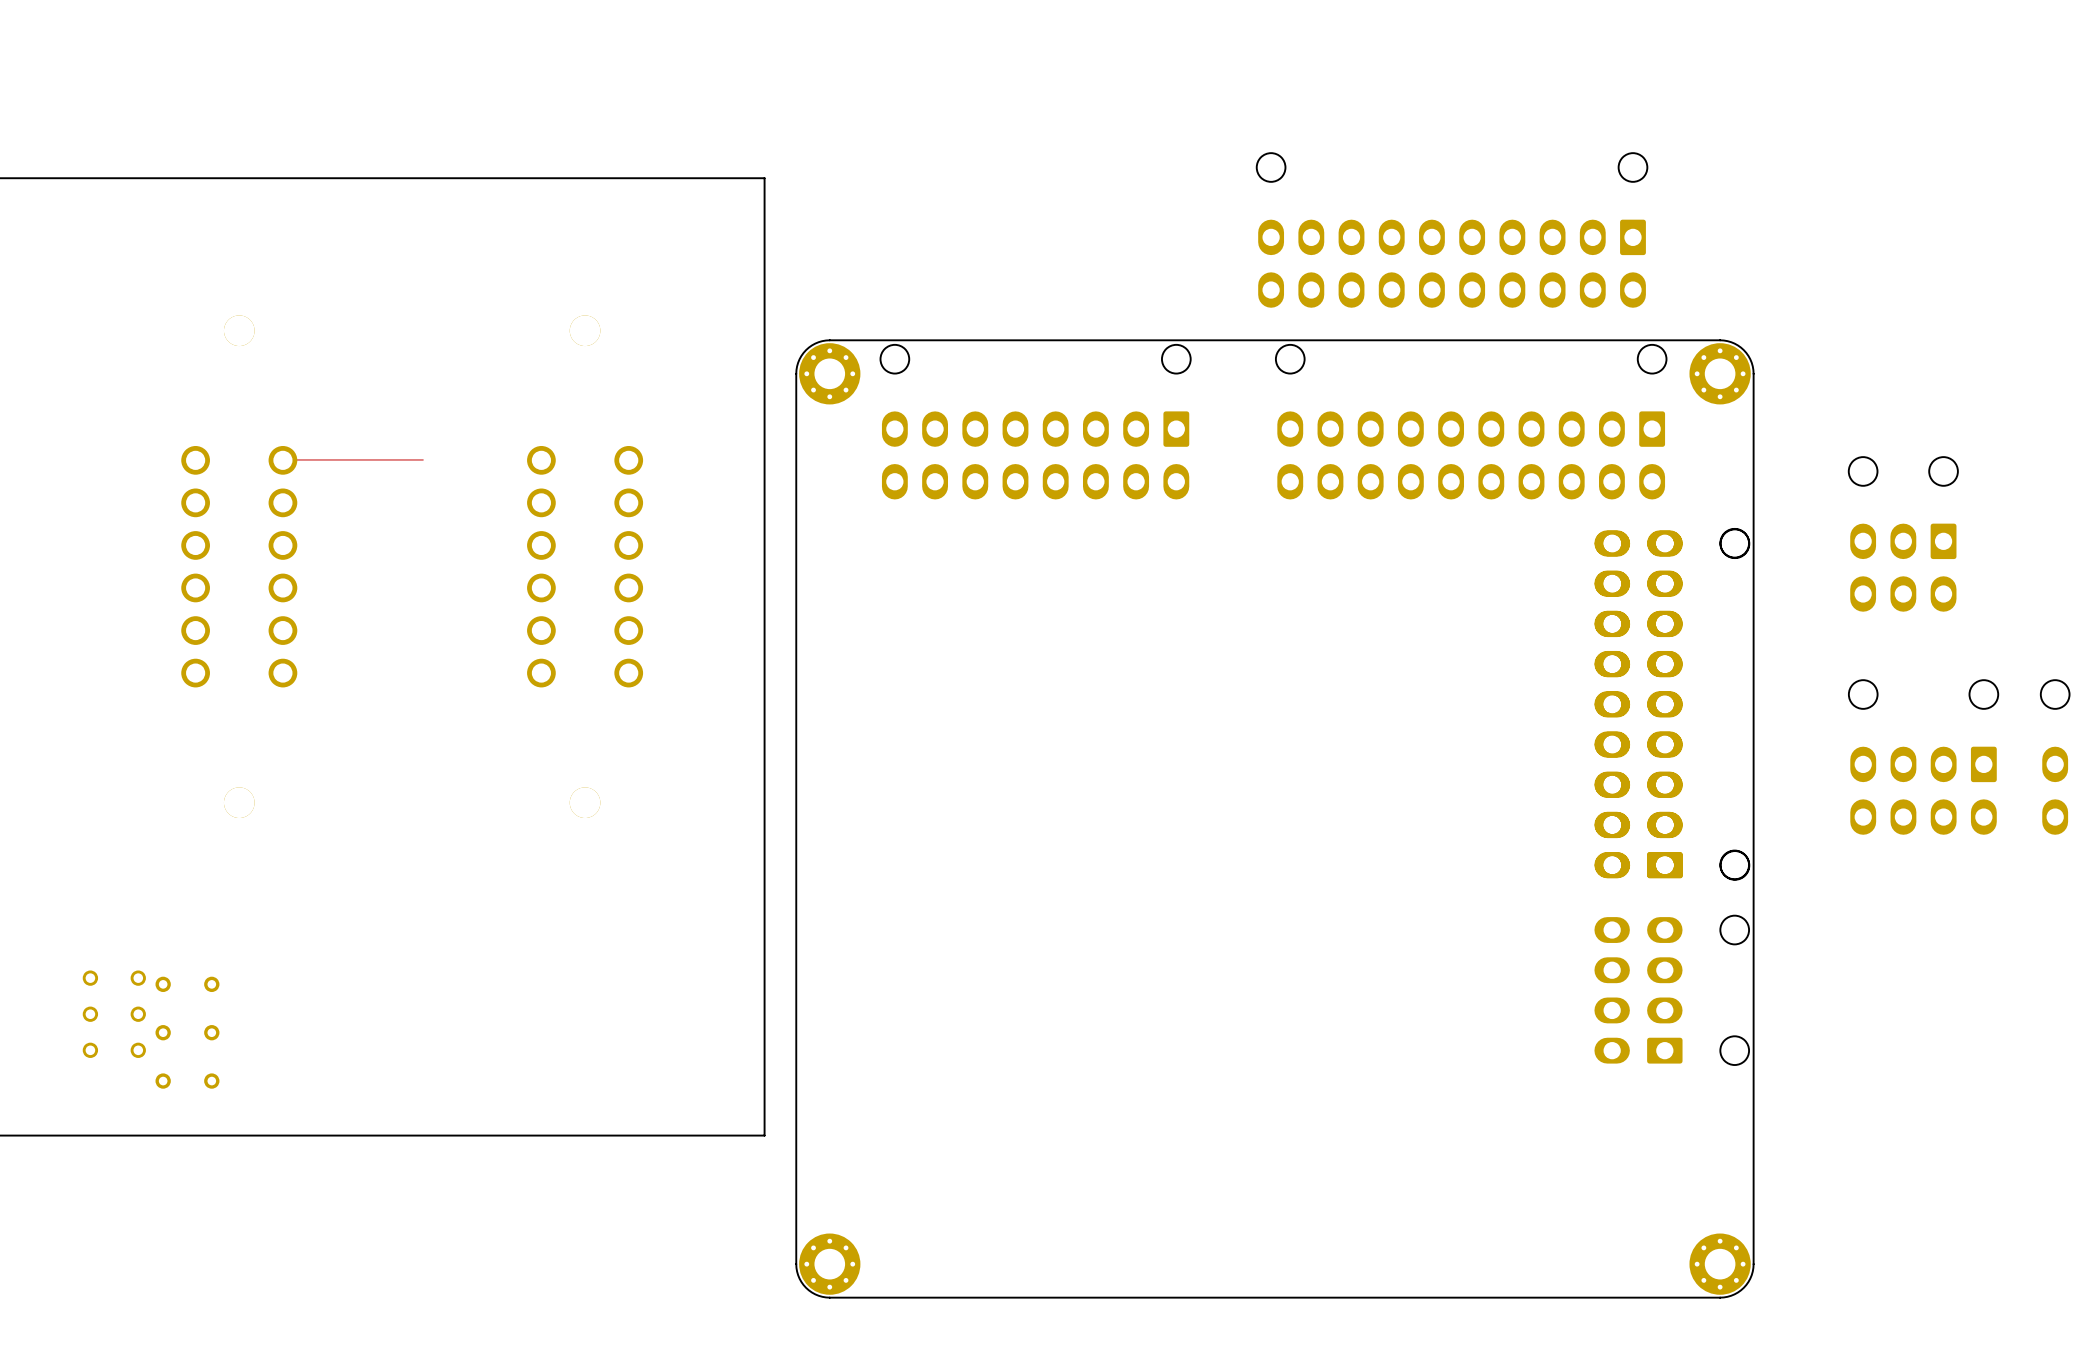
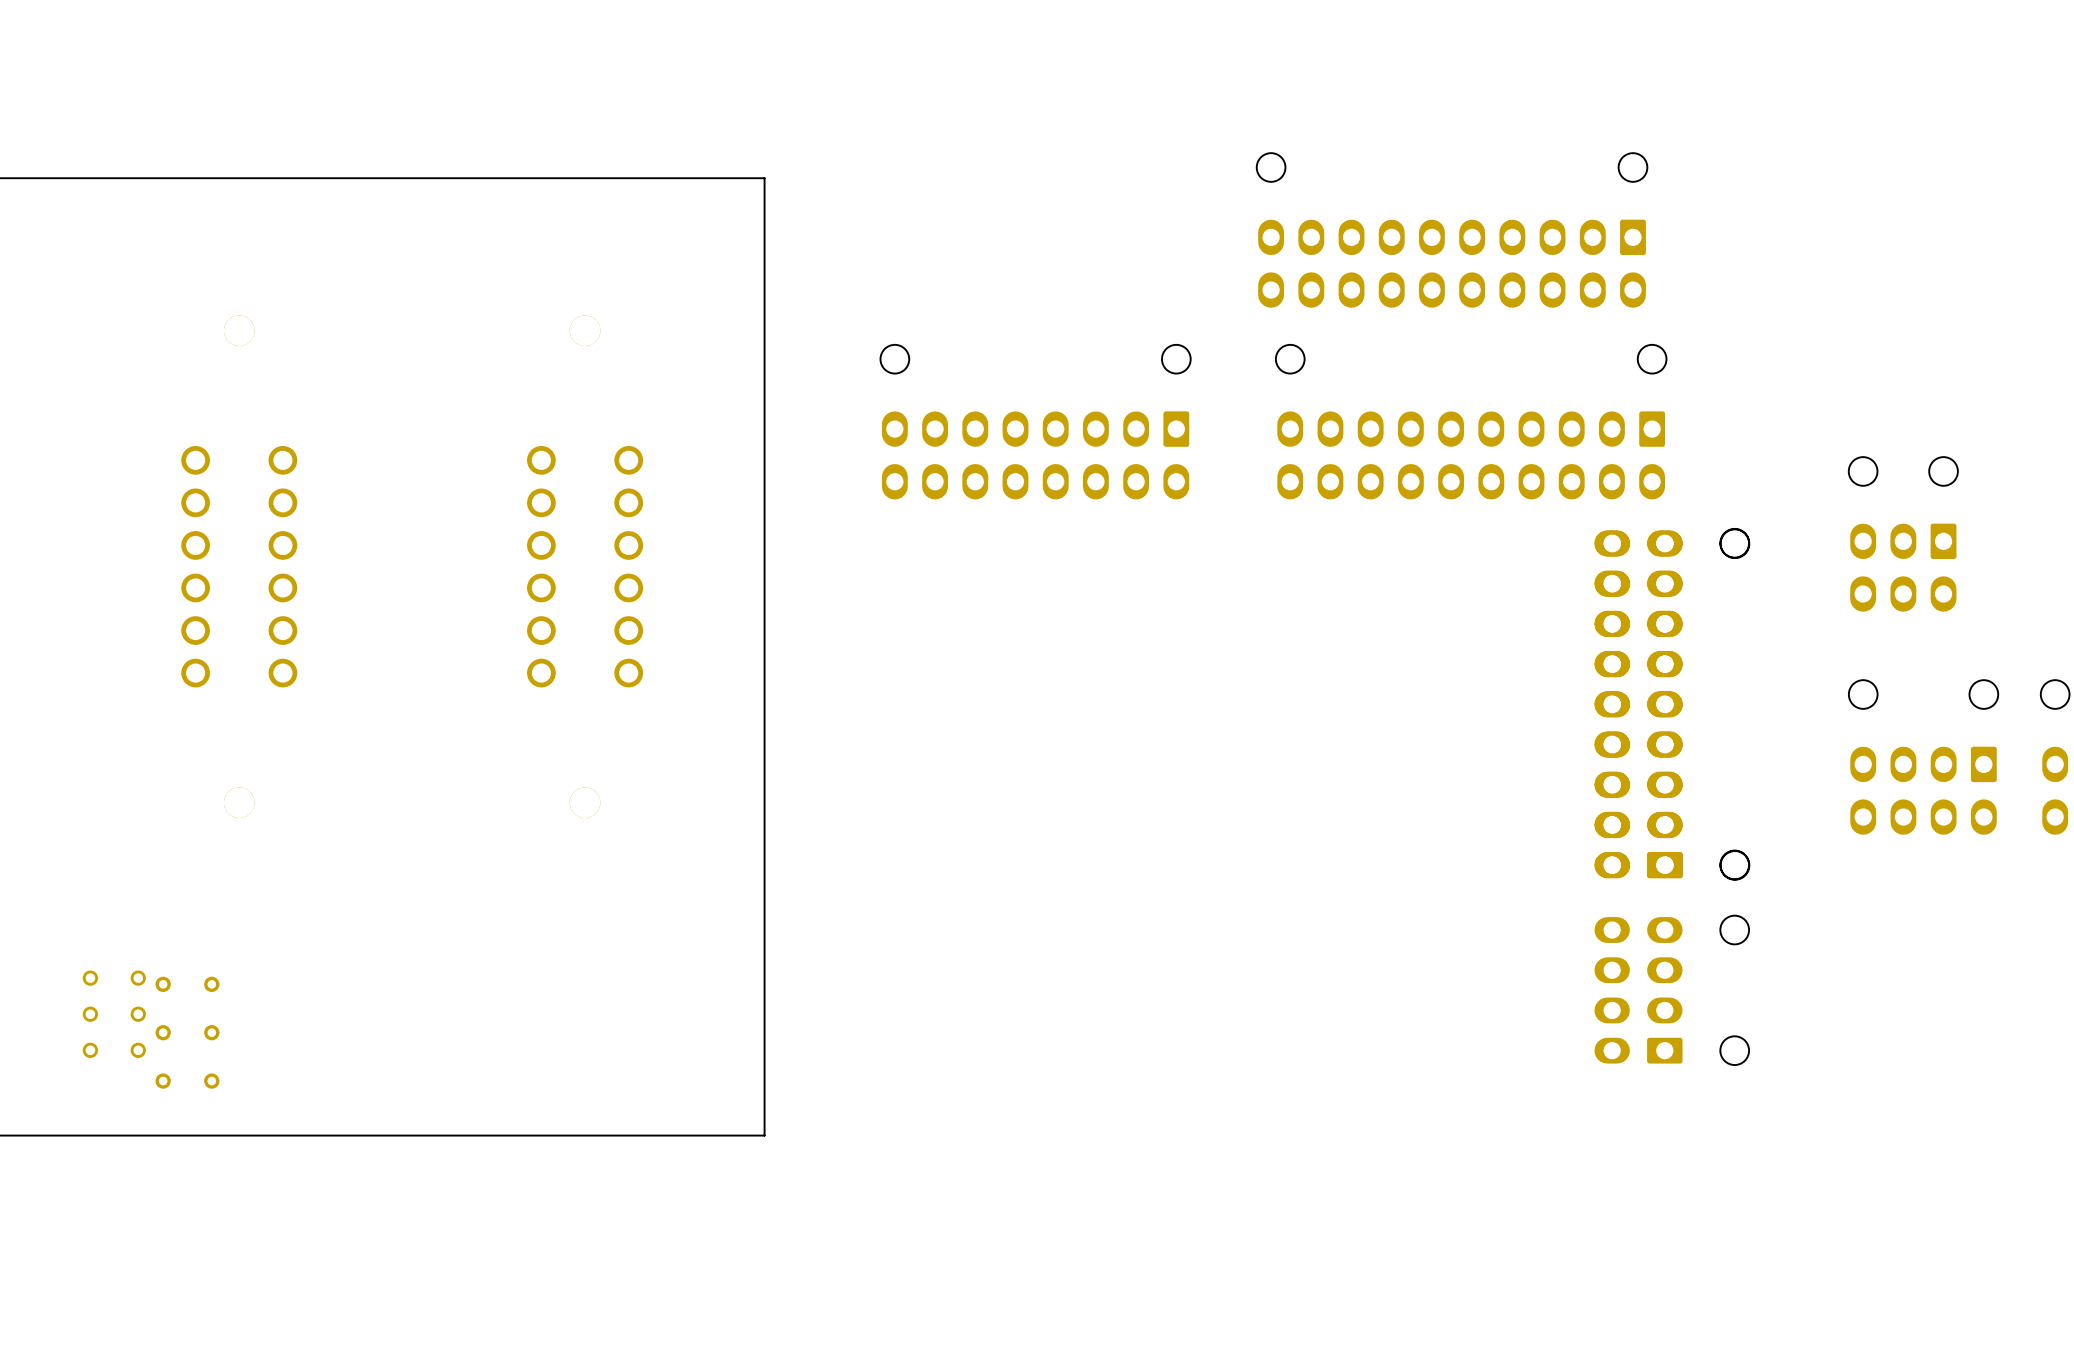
board edge: (1720, 340) (829, 340) (818, 342) (806, 350) (798, 362) (796, 373) (796, 1264) (798, 1275) (806, 1287) (818, 1295) (829, 1297) (1720, 1297) (1734, 1294) (1743, 1287) (1750, 1278) (1753, 1264) (1753, 373) (1750, 359) (1743, 350) (1731, 342) (1720, 340) -> none
part: (829, 373) -> none
part: (1720, 373) -> none
top track: (422, 459) (282, 460) -> none
part: (829, 1264) -> none
part: (1720, 1264) -> none

